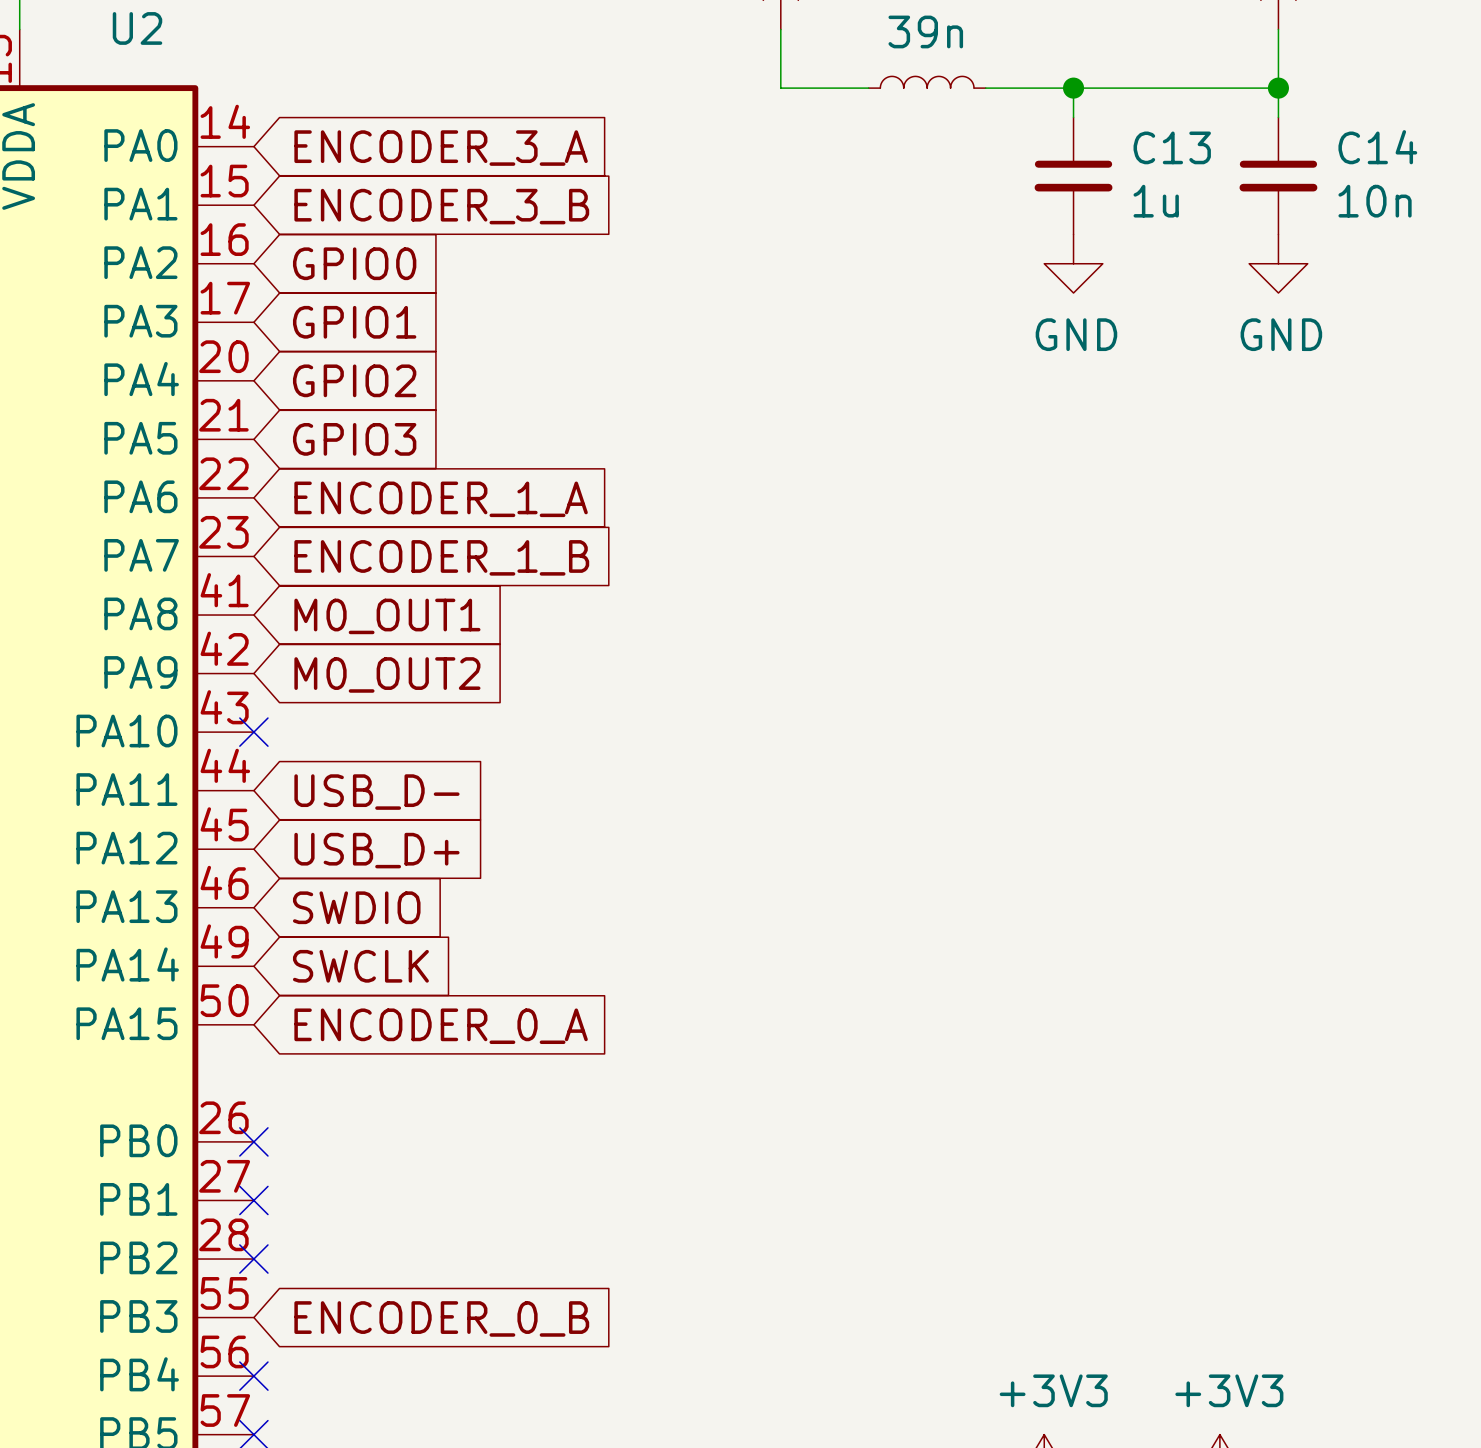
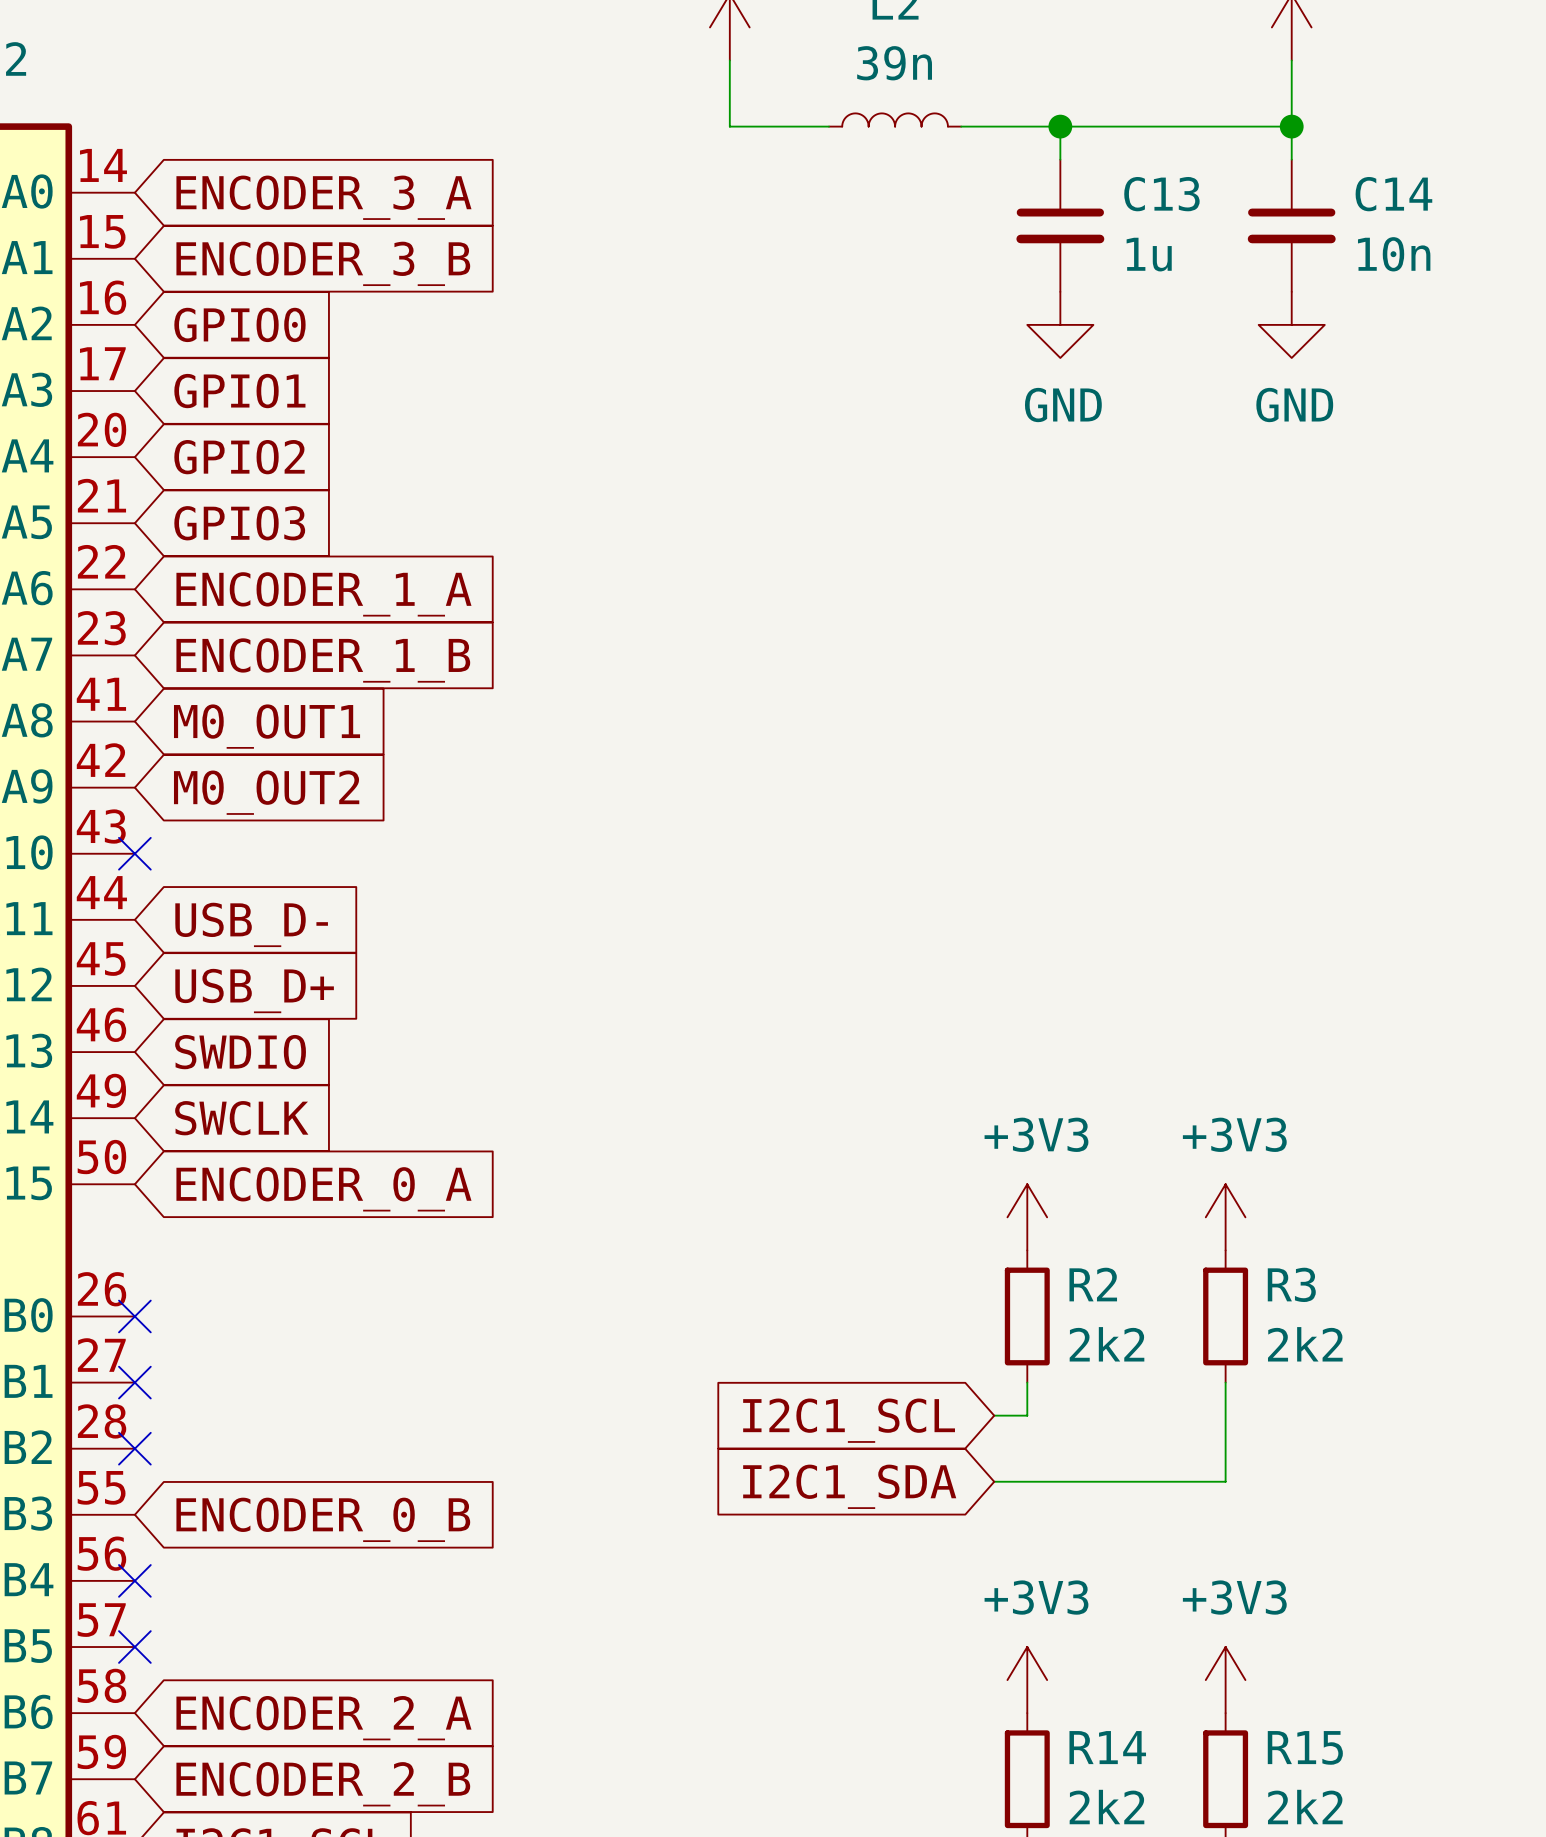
power symbol: none -> +3V3 (1027, 1217)
power symbol: none -> +3V3 (1225, 1217)
R2: none -> 2k2 (1027, 1316)
R3: none -> 2k2 (1225, 1316)
wire: none -> (1027, 1382) (1027, 1415) (994, 1415)
wire: none -> (1225, 1382) (1225, 1481) (994, 1481)
global label: none -> I2C1_SCL (849, 1420)
global label: none -> I2C1_SDA (849, 1486)

